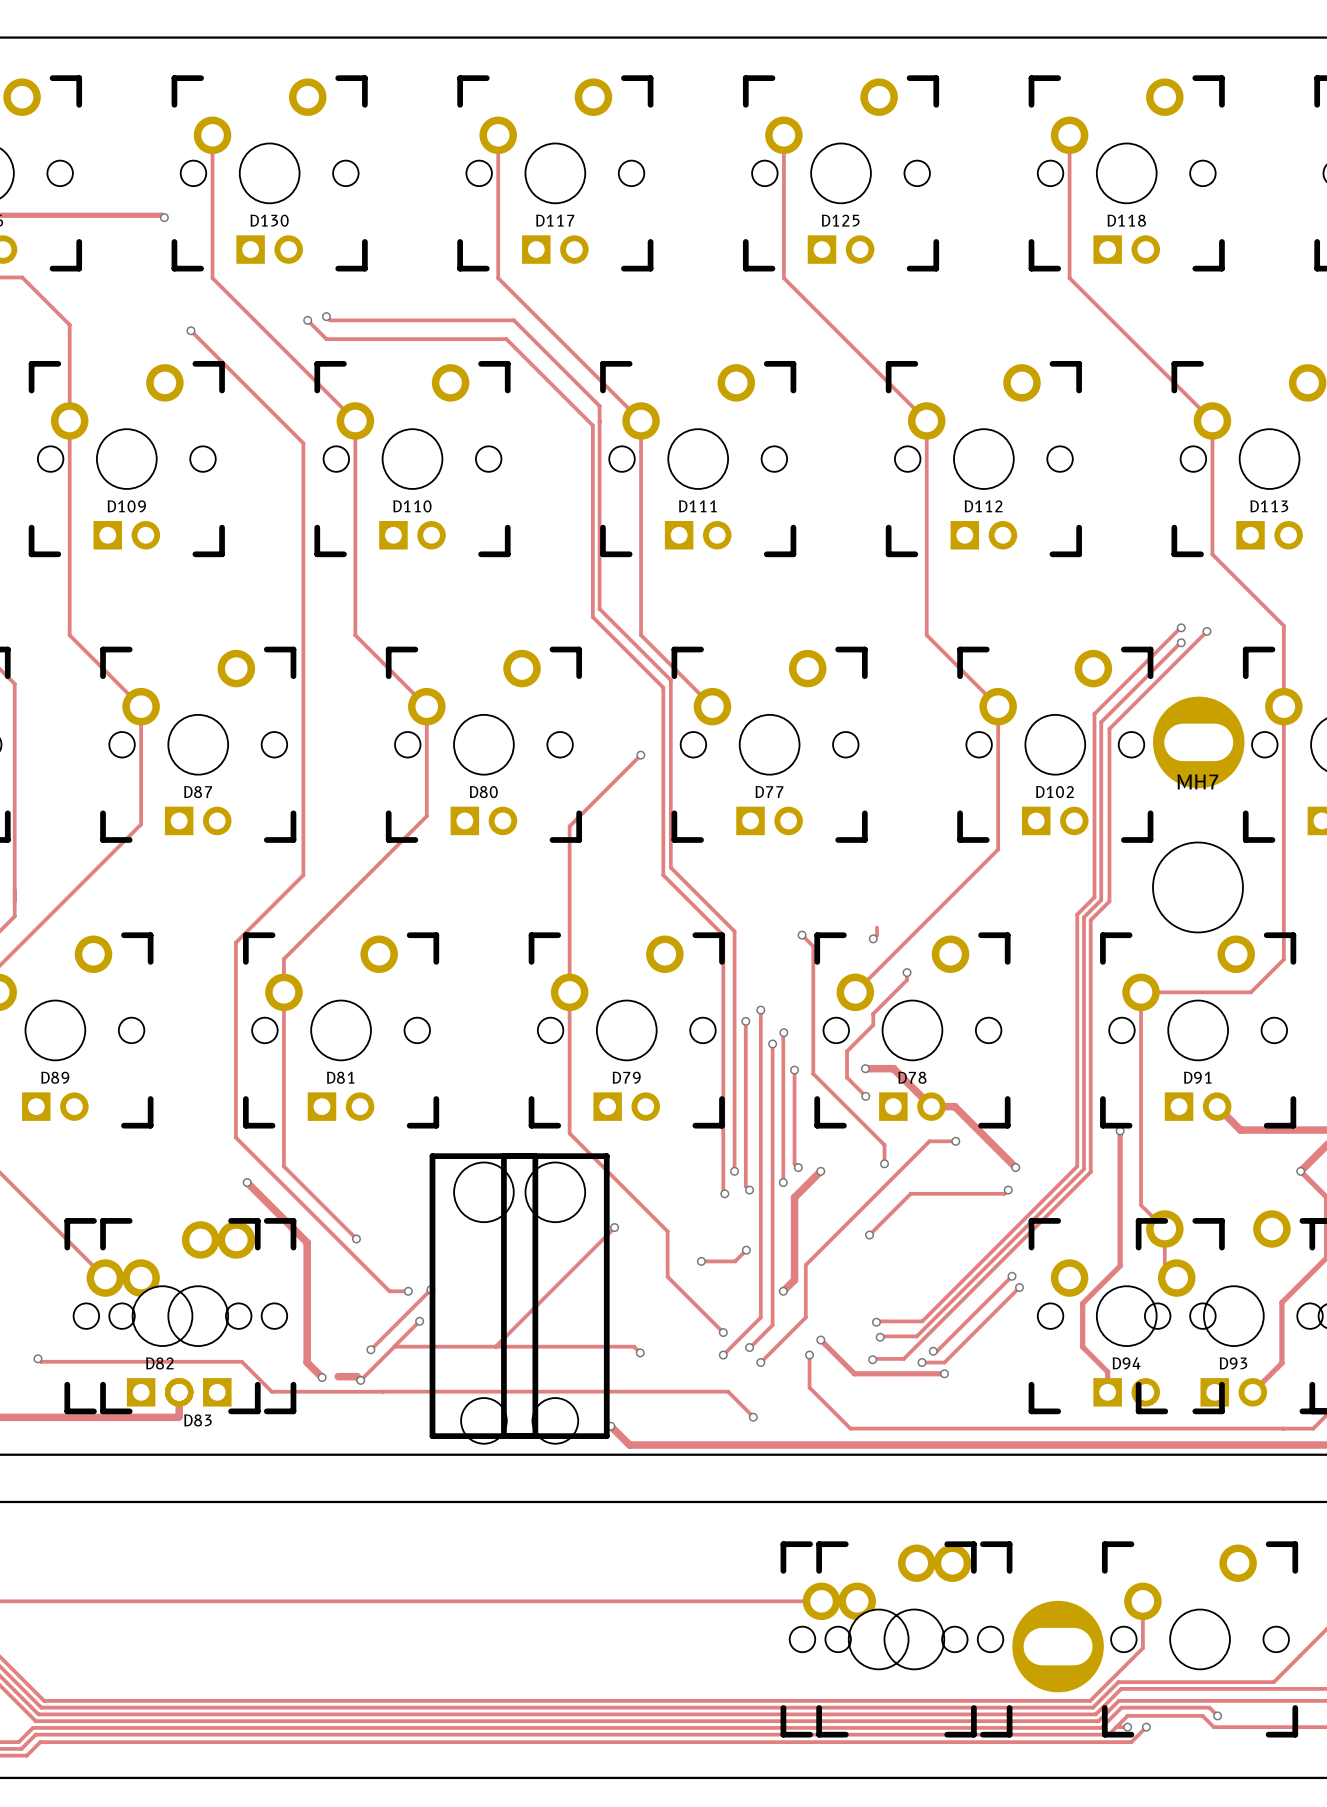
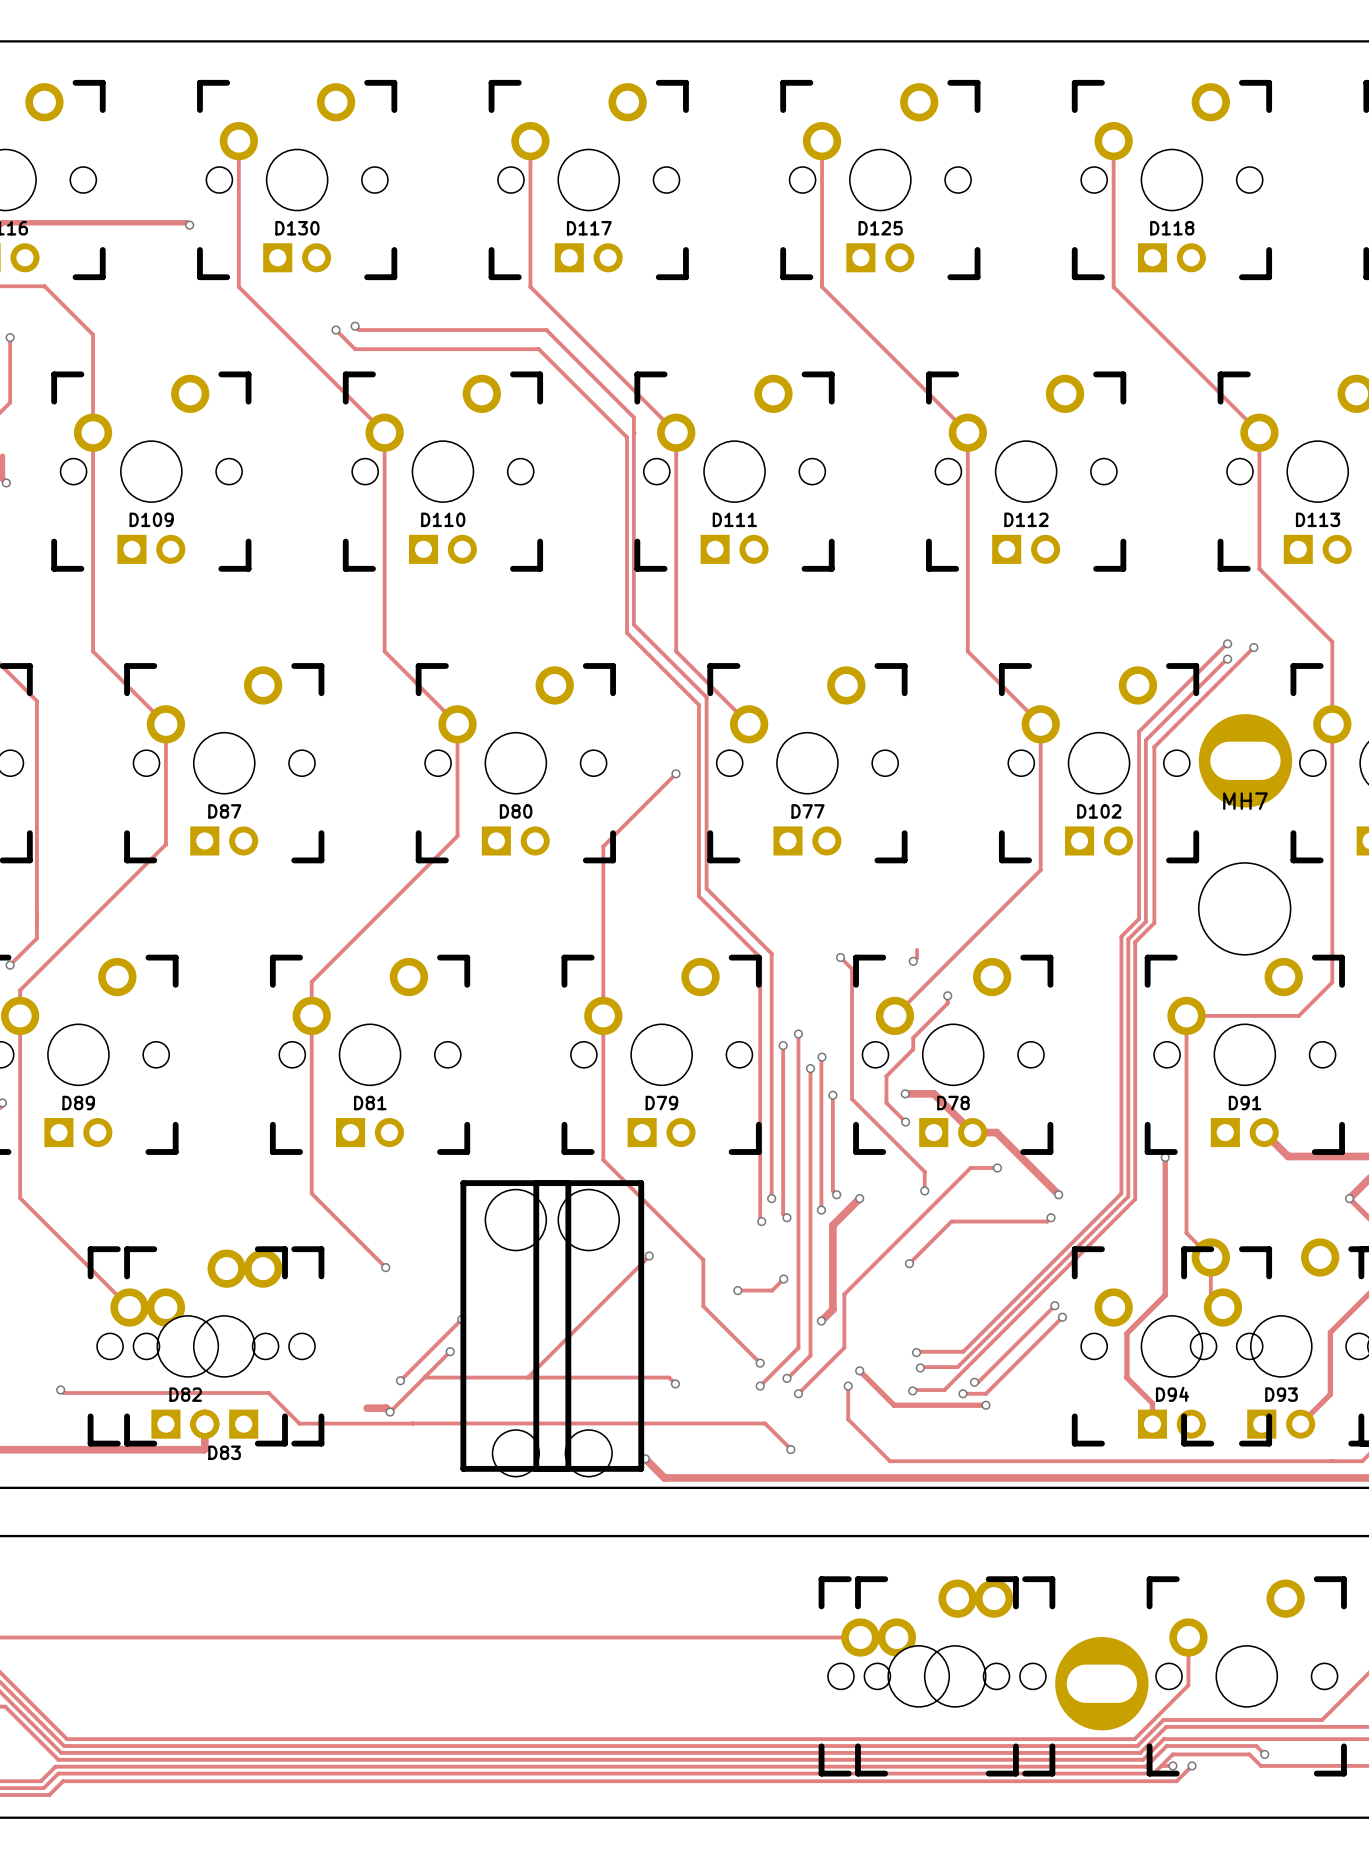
track: (190, 330) (303, 443) (303, 875) (235, 942) (235, 1137) (389, 1291) (408, 1291) -> none
via: (190, 330) -> none
track: (247, 1182) (307, 1242) (307, 1362) (322, 1377) -> none
via: (247, 1182) -> none
via: (408, 1291) -> none
via: (322, 1377) -> none

